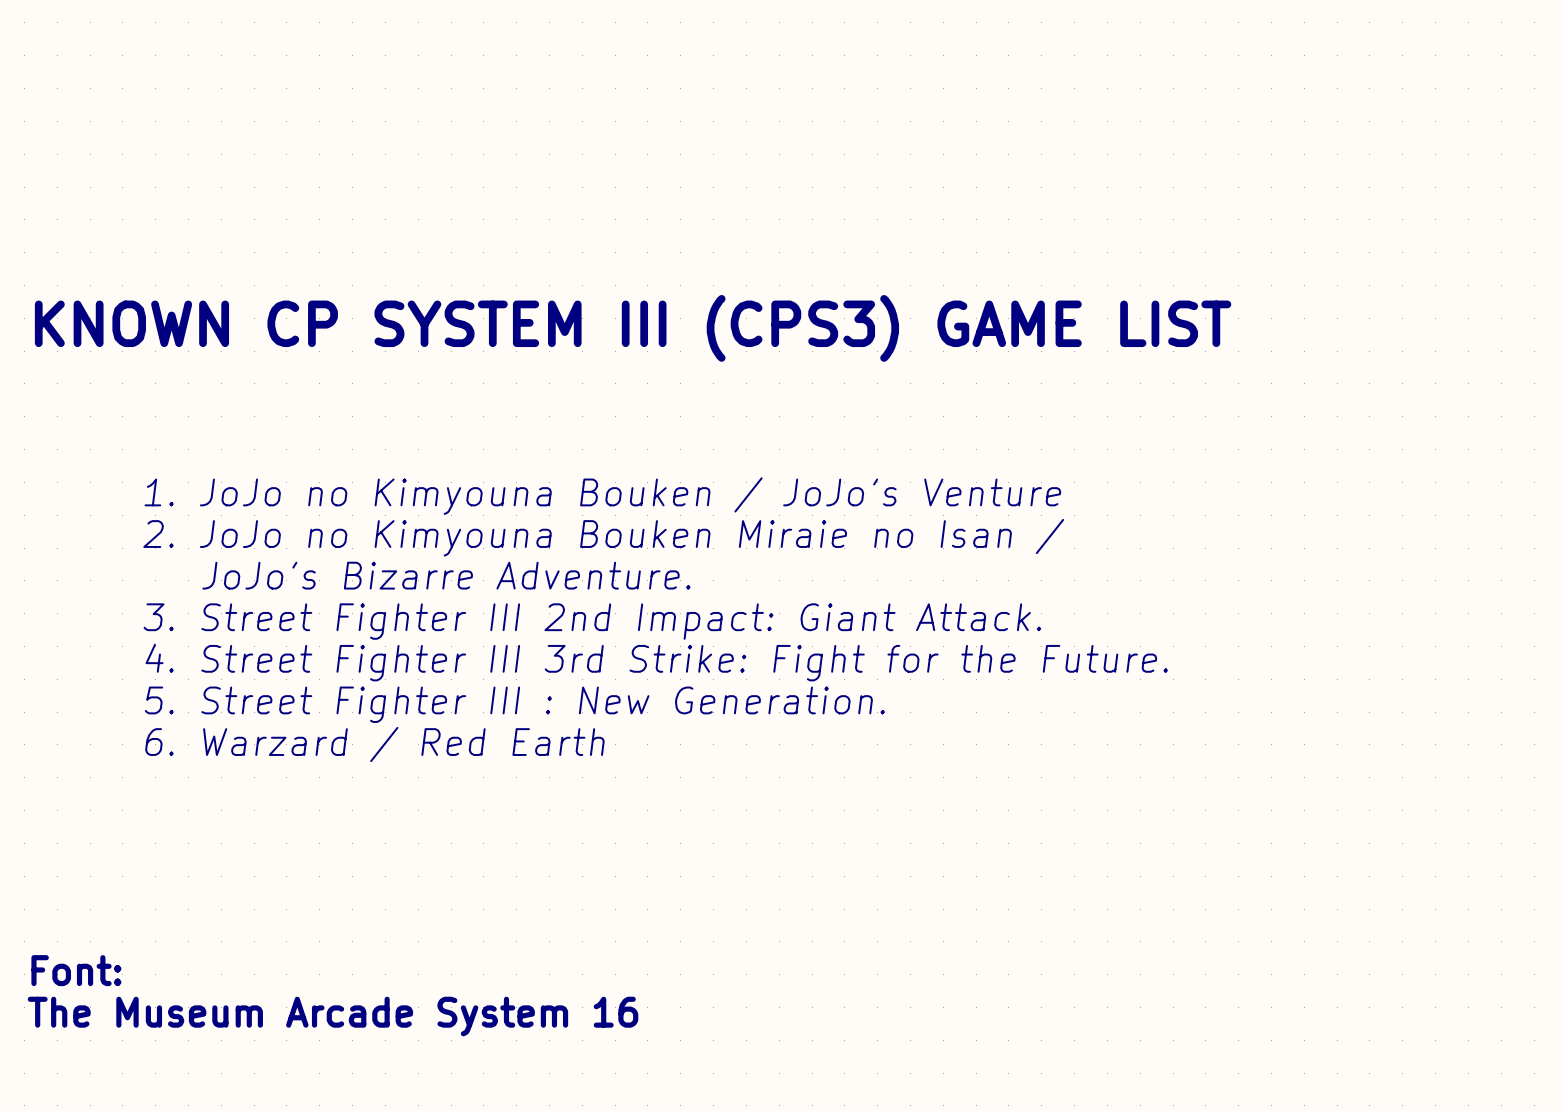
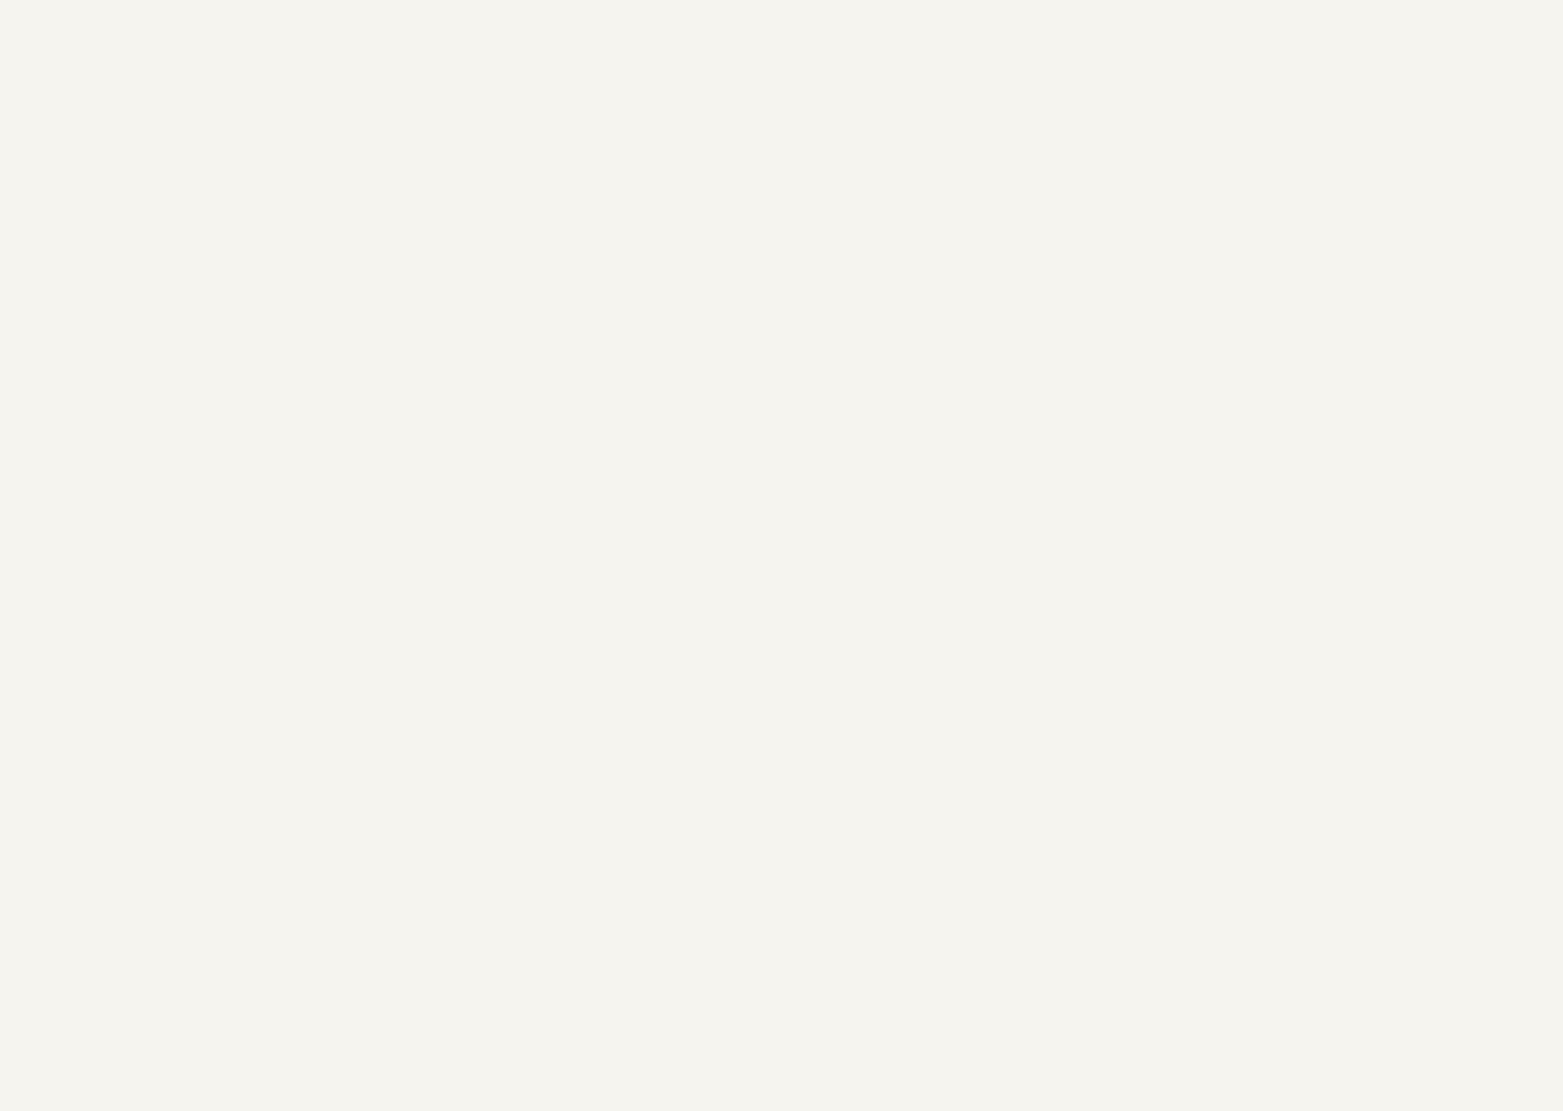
text: KNOWN CP SYSTEM III (CPS3) GAME LIST (633, 328) -> none
text: 1. JoJo no Kimyouna Bouken / JoJo's Venture (602, 496) -> none
text: 2. JoJo no Kimyouna Bouken Miraie no Isan / (603, 537) -> none
text: JoJo's Bizarre Adventure. (446, 575) -> none
text: 3. Street Fighter III 2nd Impact: Giant Attack. (592, 621) -> none
text: 4. Street Fighter III 3rd Strike: Fight for the Future. (656, 662) -> none
text: 5. Street Fighter III : New Generation. (514, 704) -> none
text: 6. Warzard / Red Earth (374, 744) -> none
text: Font: (76, 970) -> none
text: The Museum Arcade System 16 (332, 1016) -> none

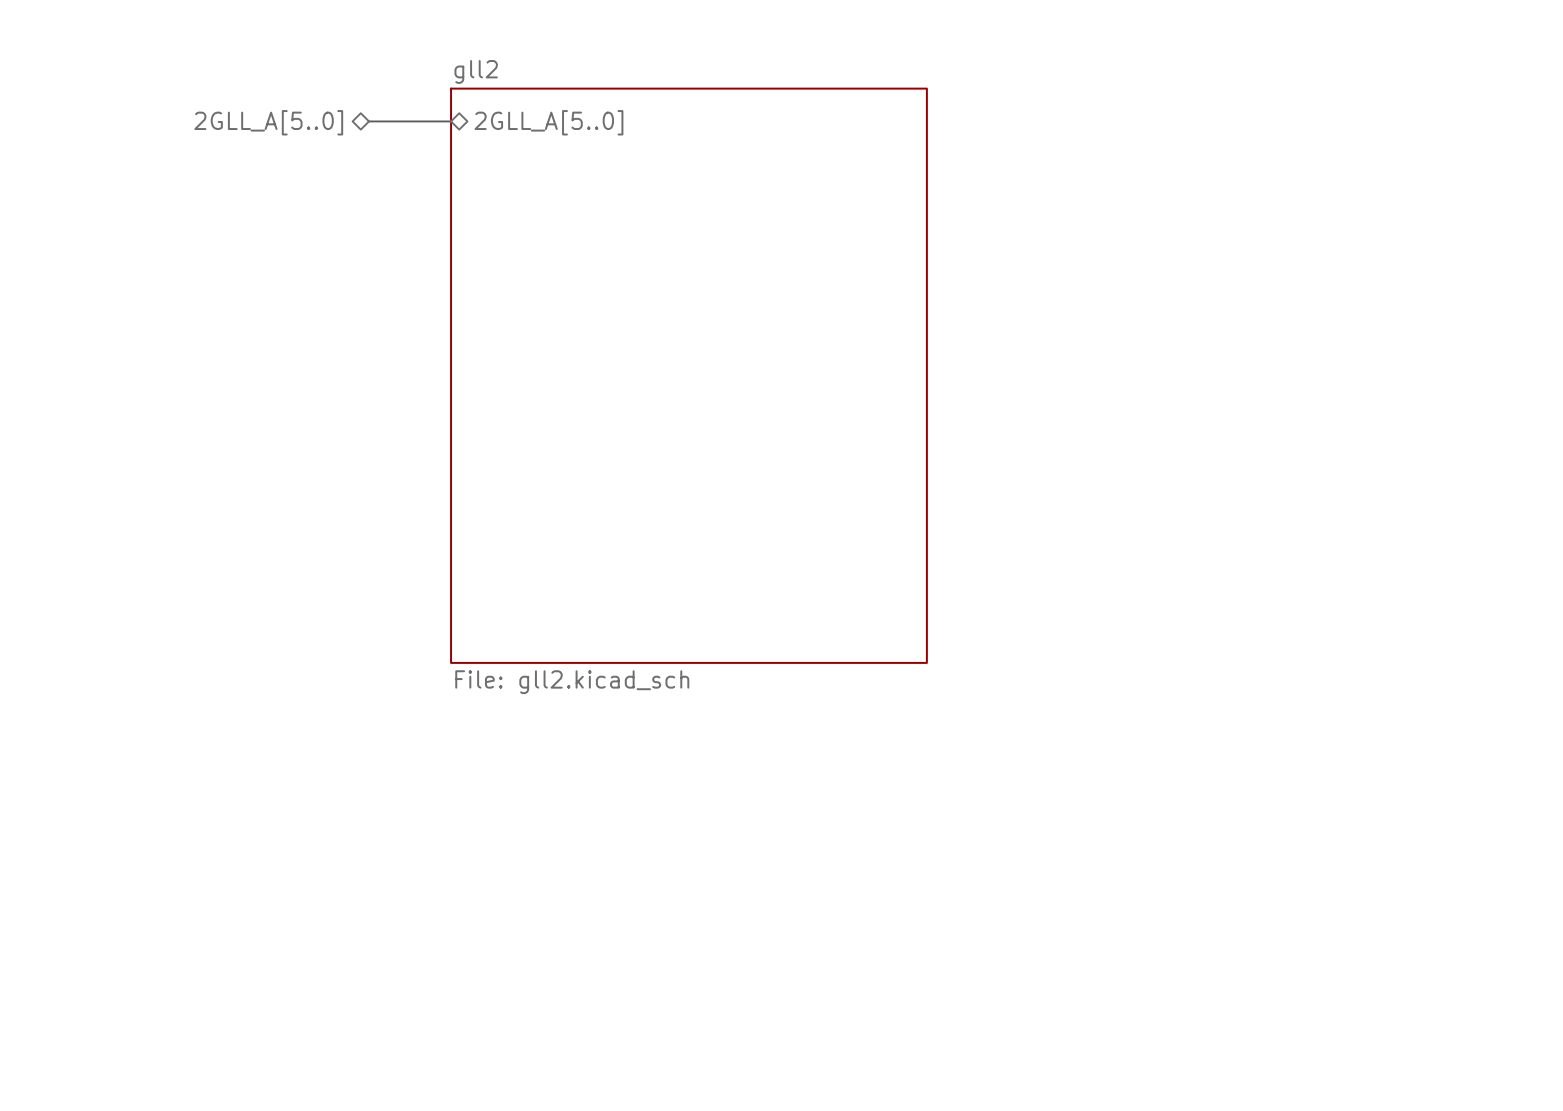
bus: none -> (369, 121) (451, 121)
hierarchical label: none -> 2GLL_A[5..0] (268, 122)
sheet pin: none -> 2GLL_A[5..0] (548, 122)
sheet gll2: none -> File: gll2.kicad_sch (688, 375)

